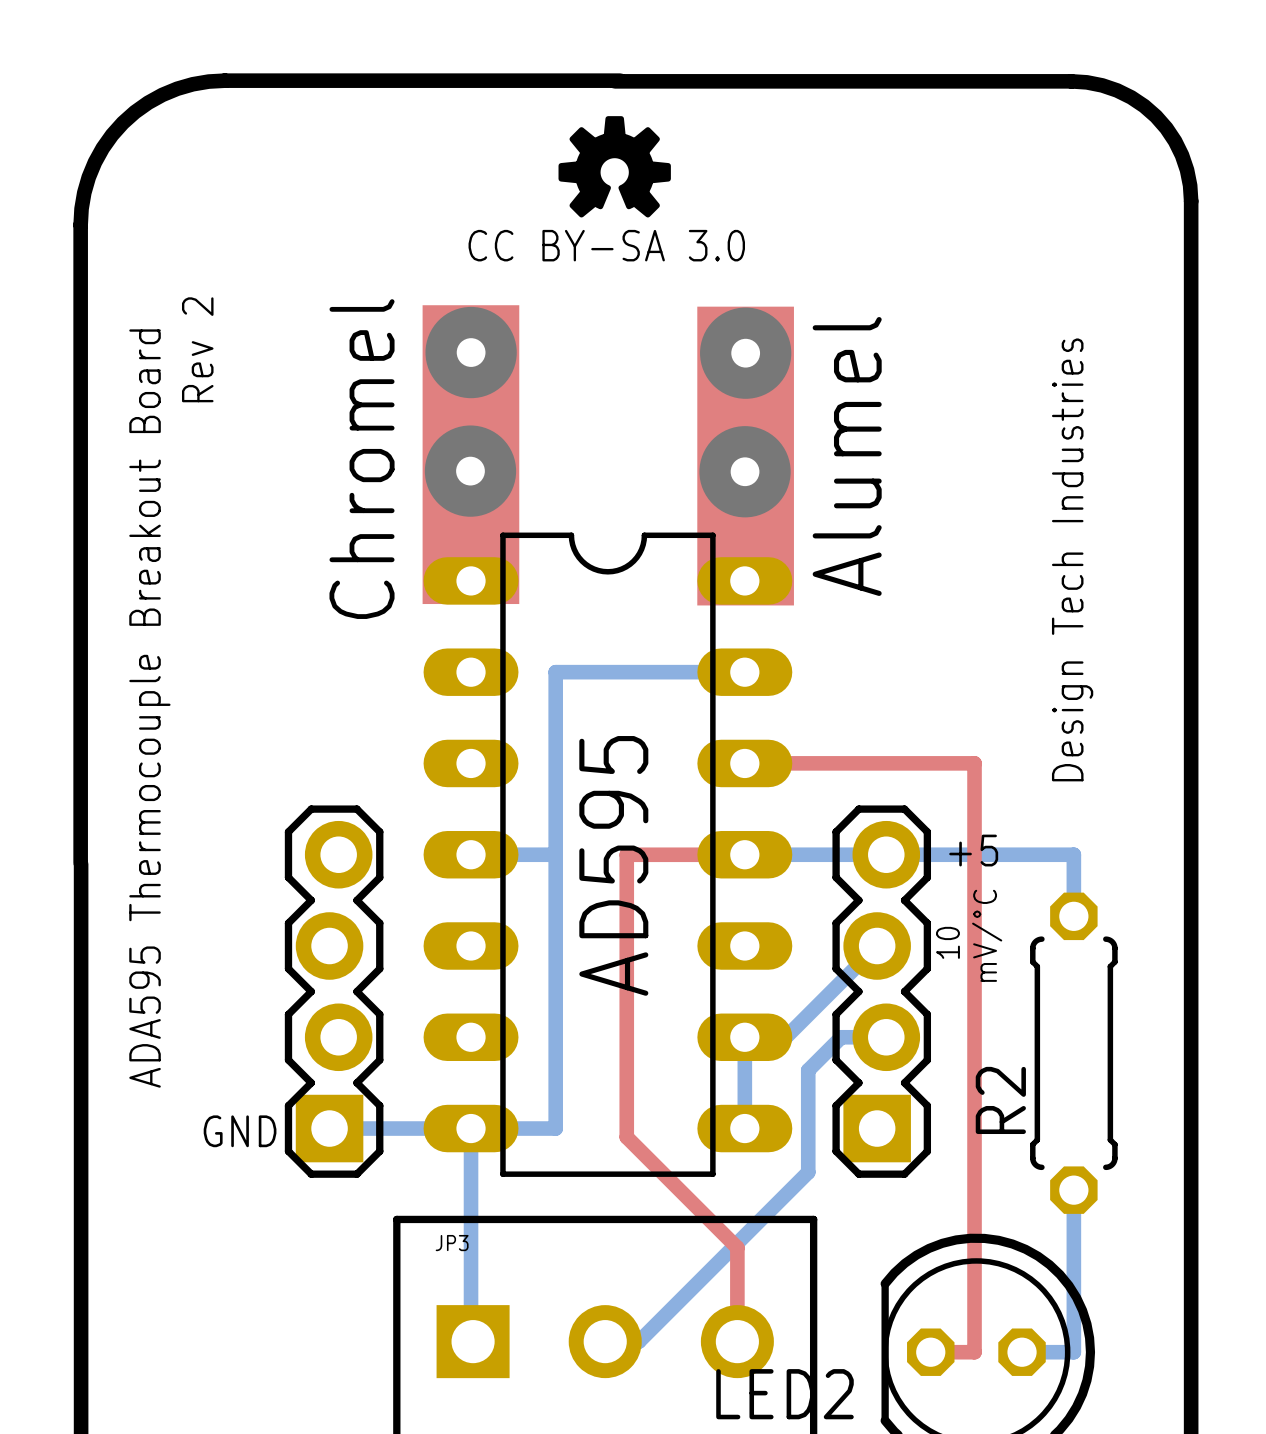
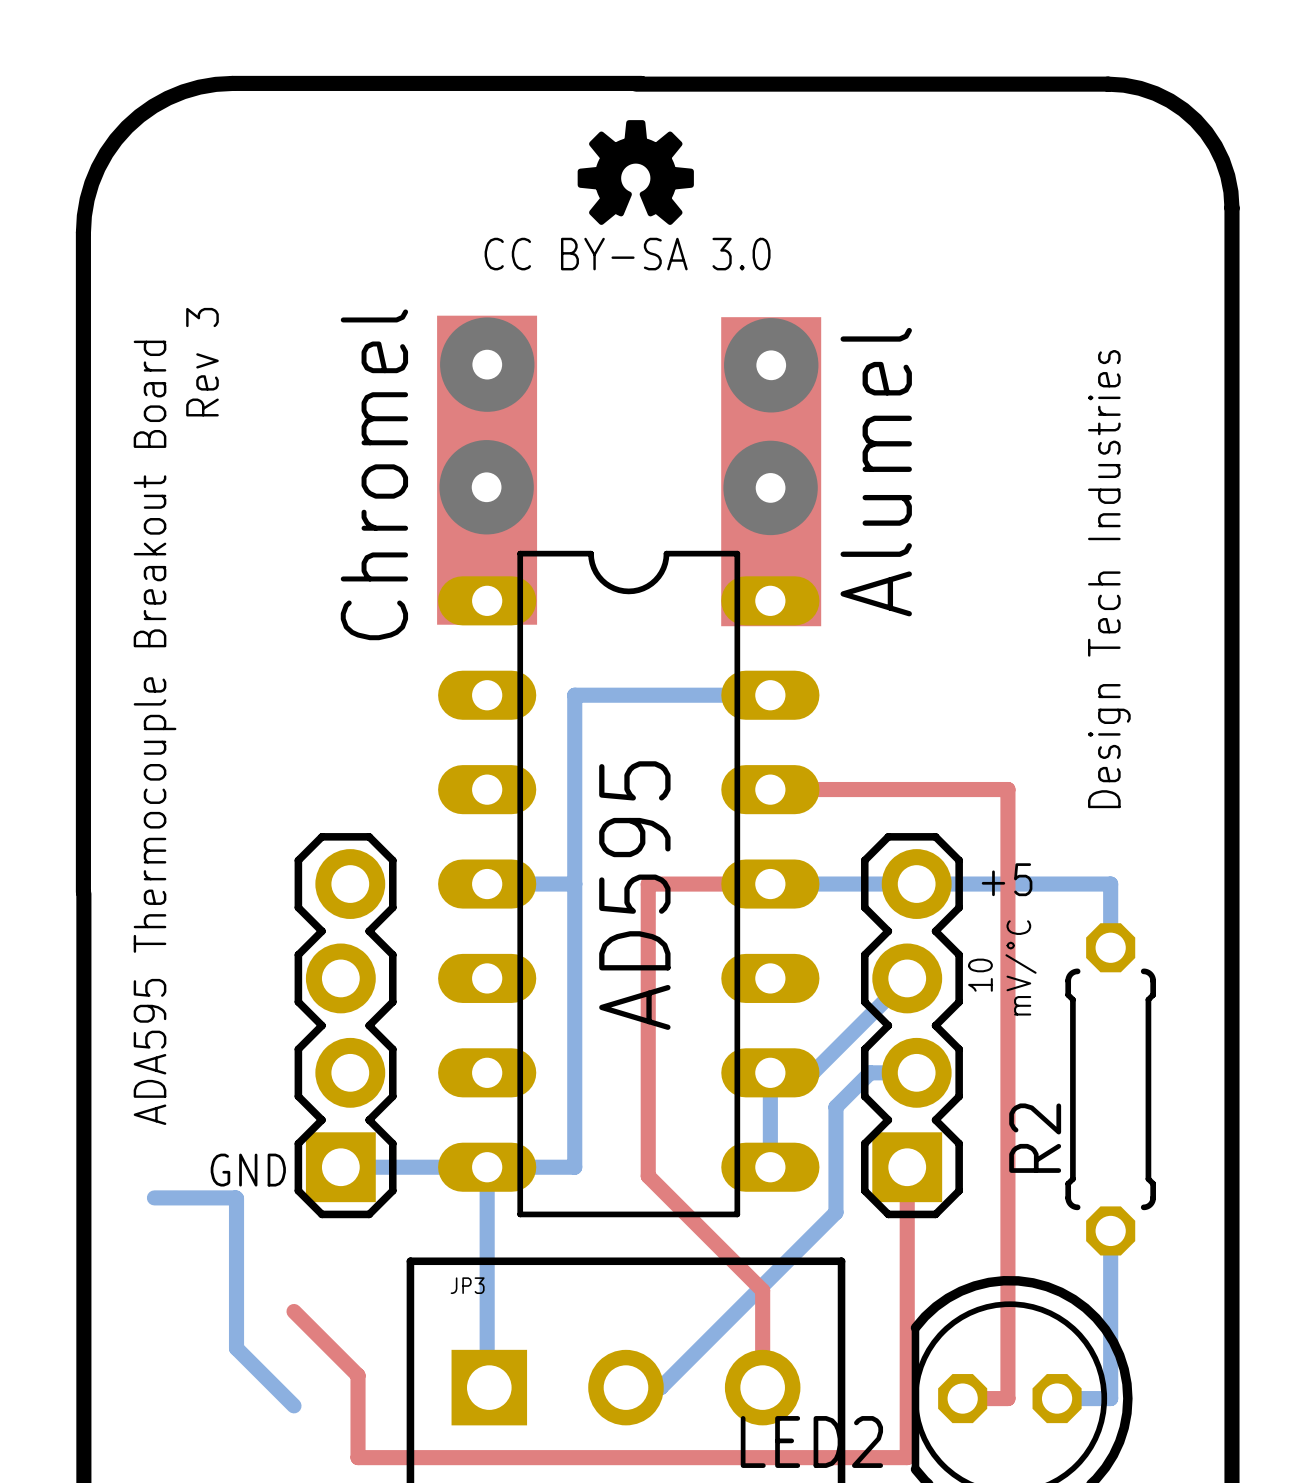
text: Rev 2 (197, 349) -> Rev 3 (202, 362)
top track: none -> (907, 1167) (907, 1457) (358, 1457) (358, 1375) (294, 1311)
bottom track: none -> (154, 1197) (236, 1198) (236, 1348) (294, 1405)

